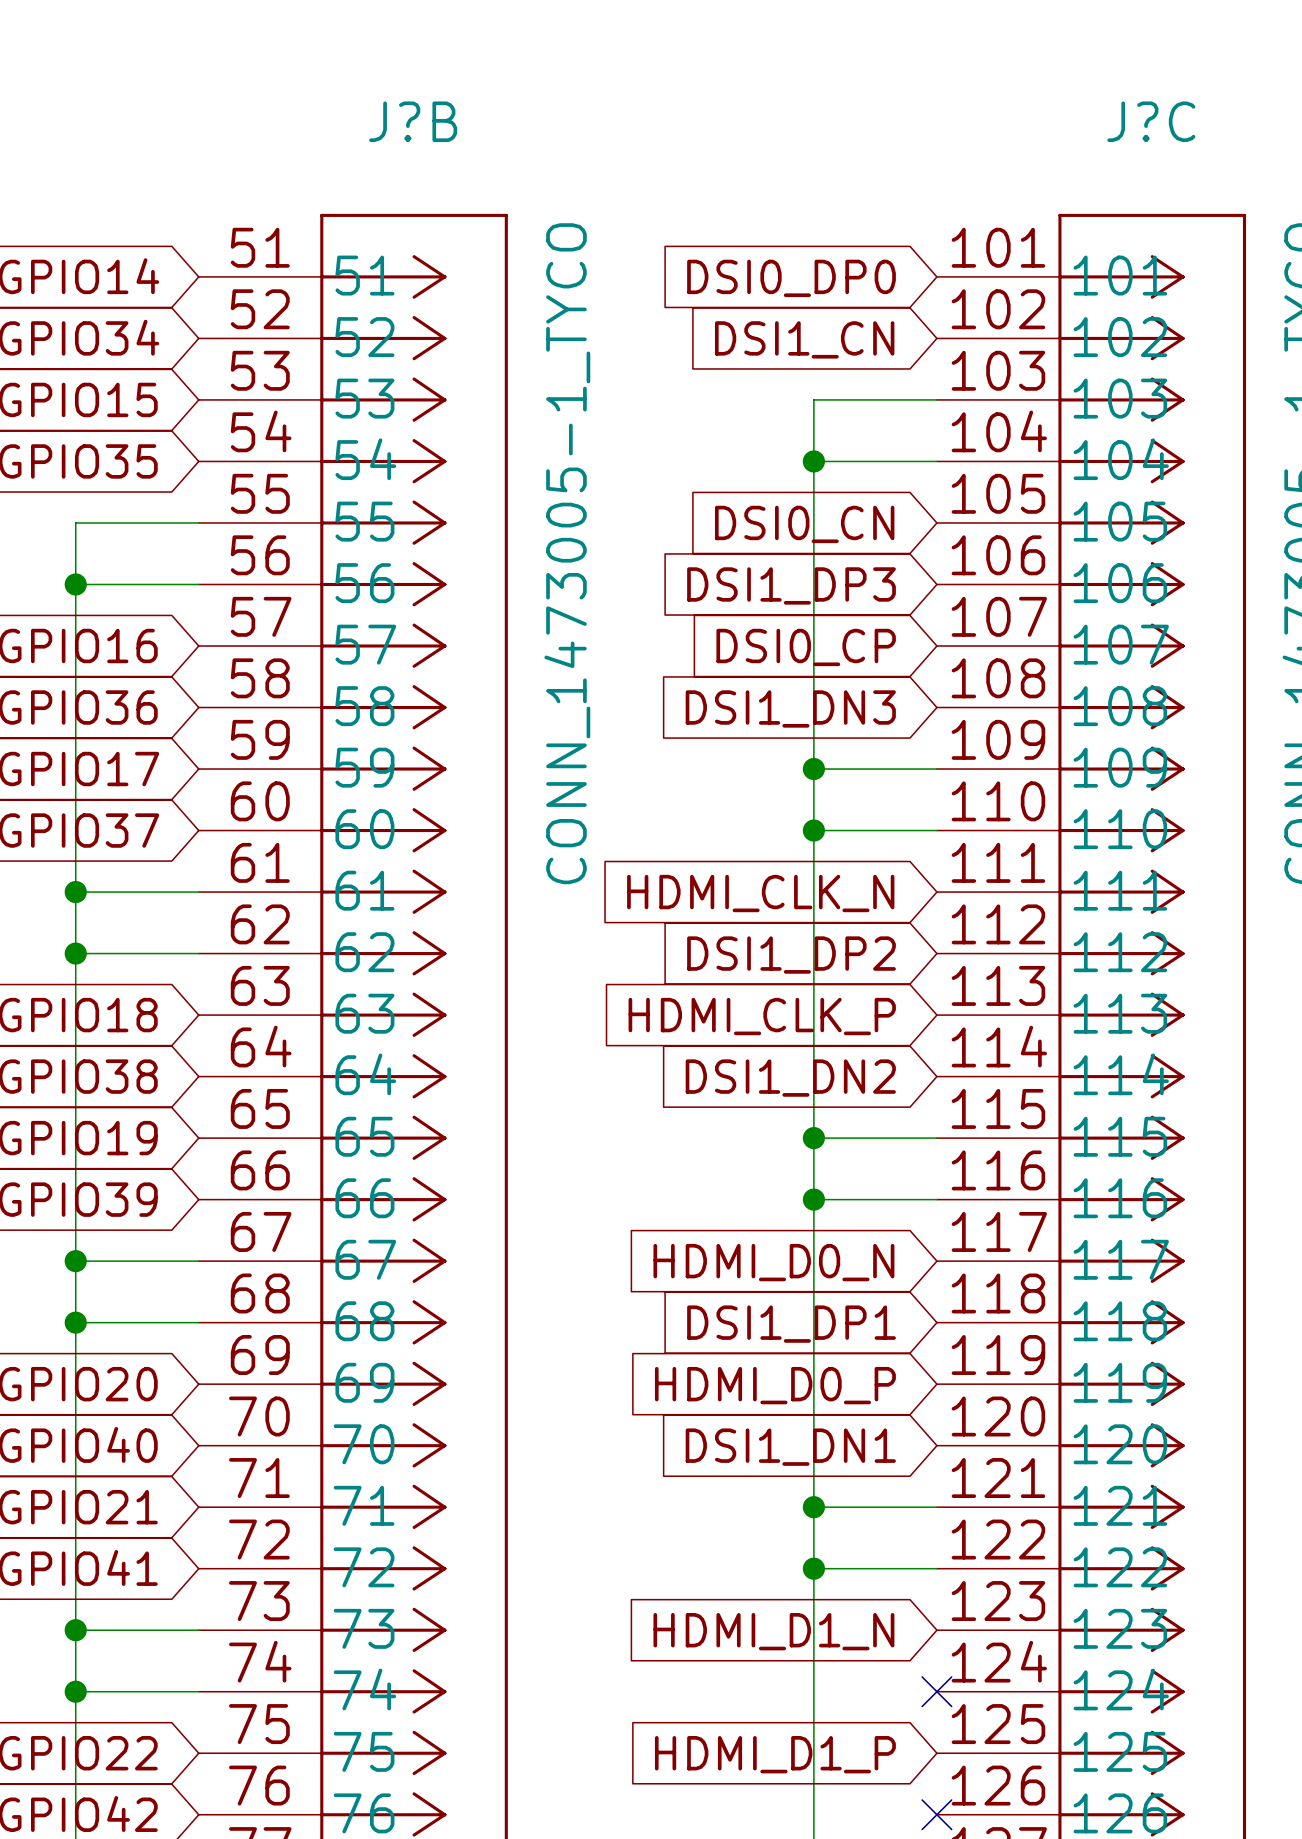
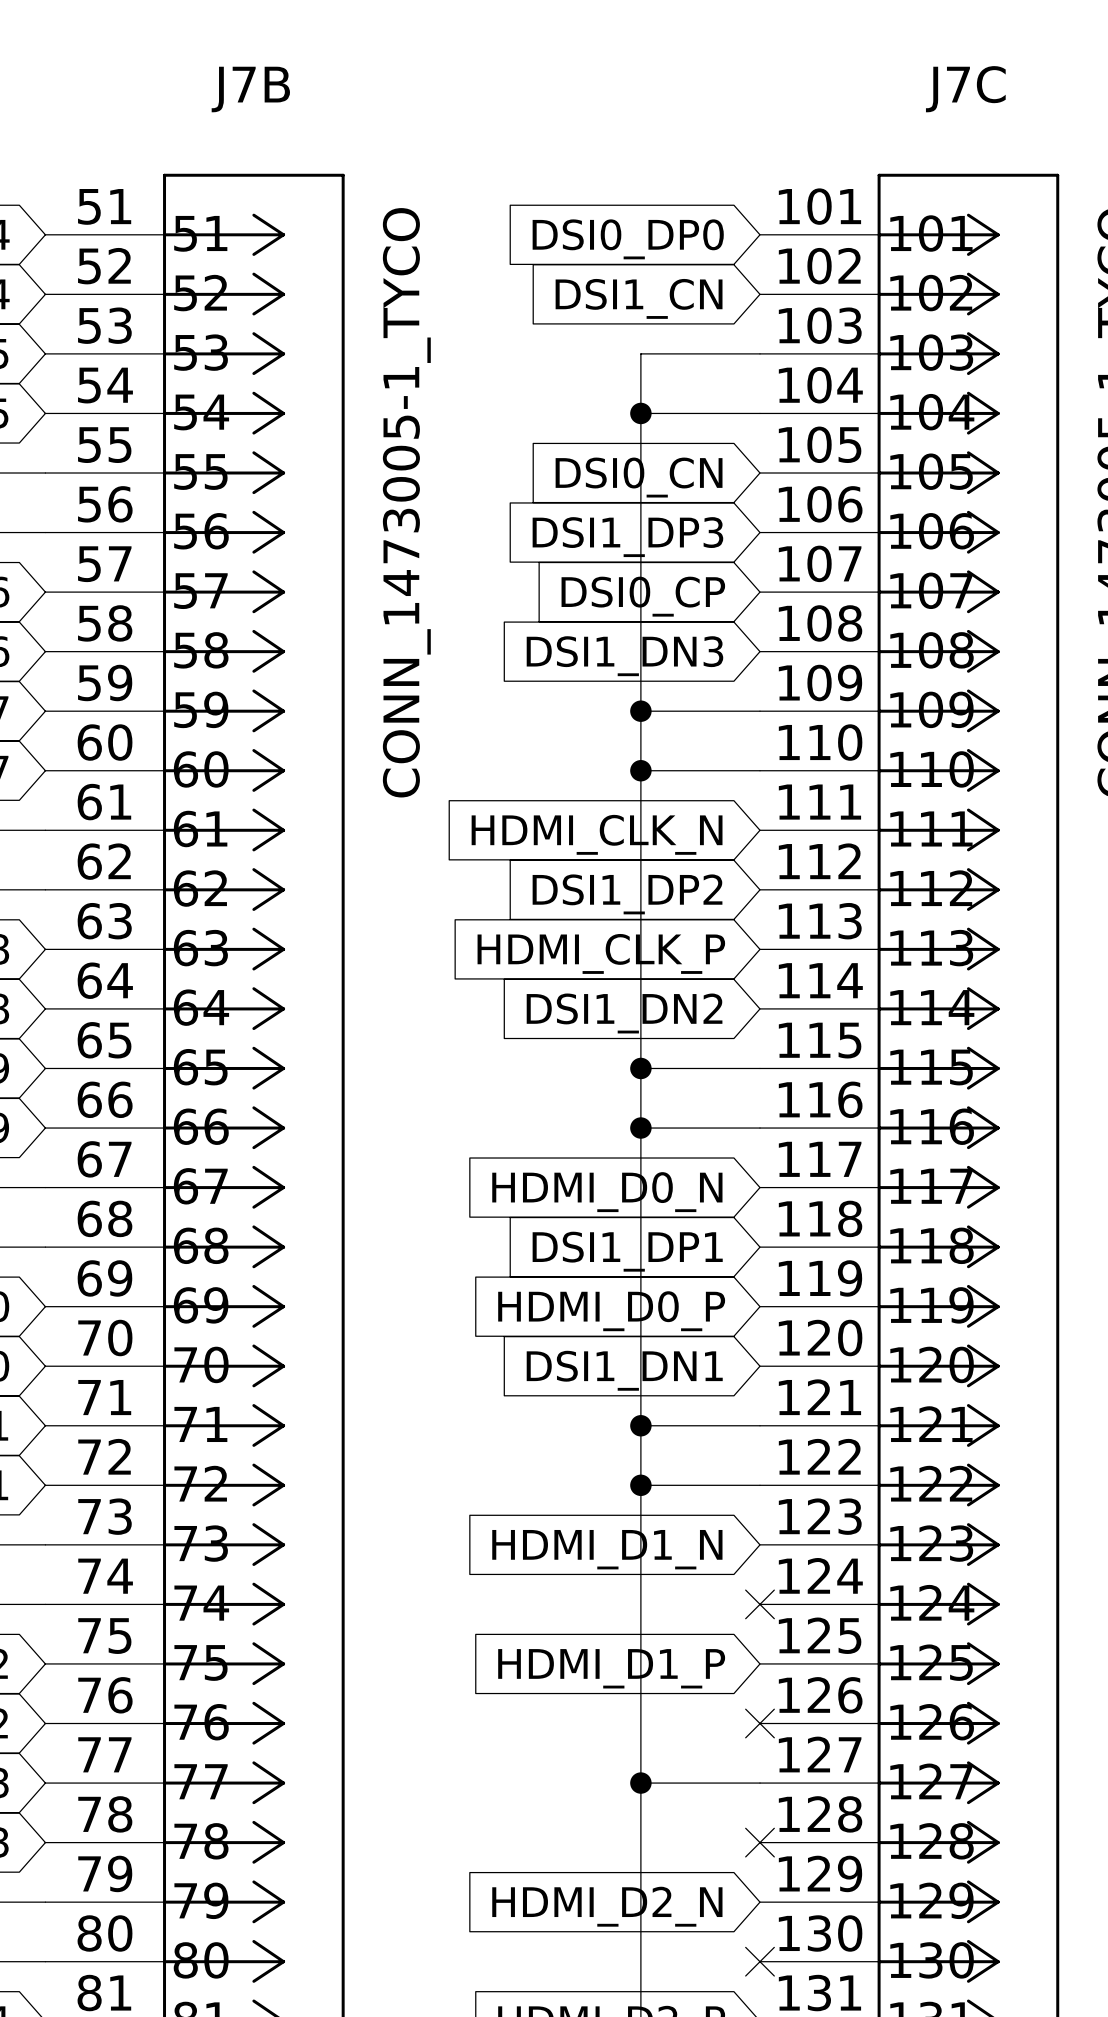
J?B name: J?B (413, 121) -> J7B (250, 89)
J?C name: J?C (1151, 121) -> J7C (965, 89)

